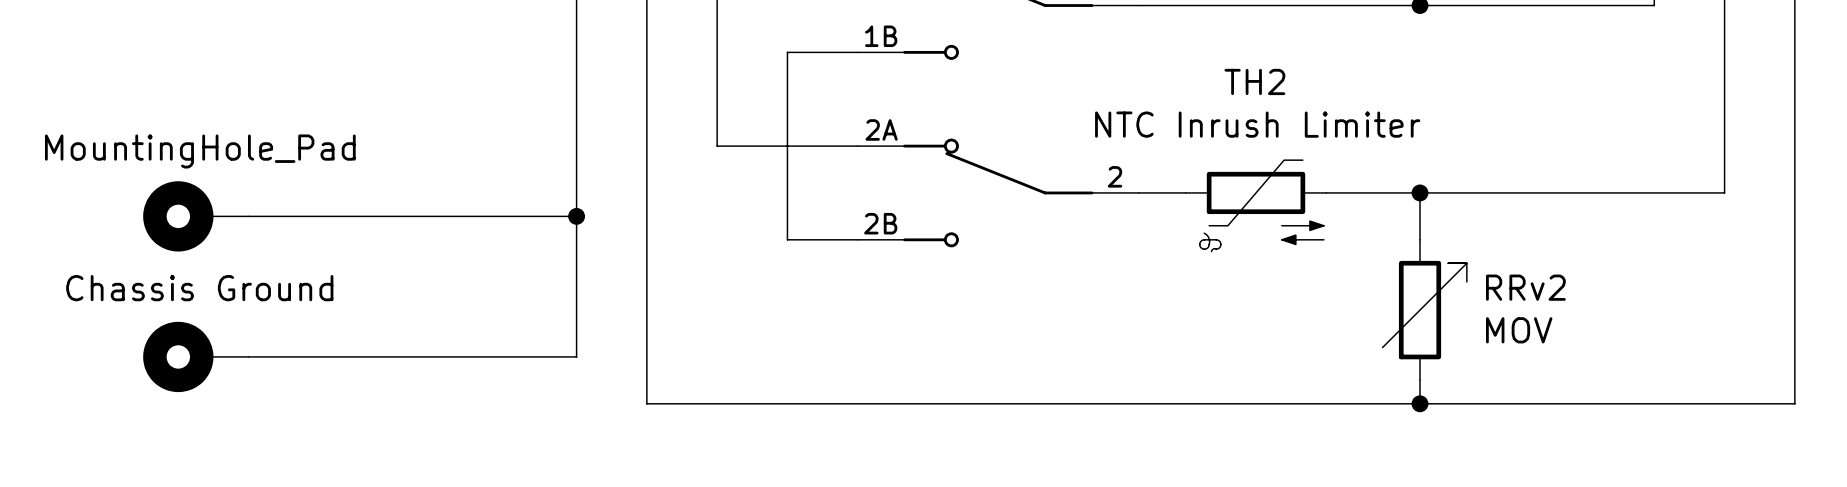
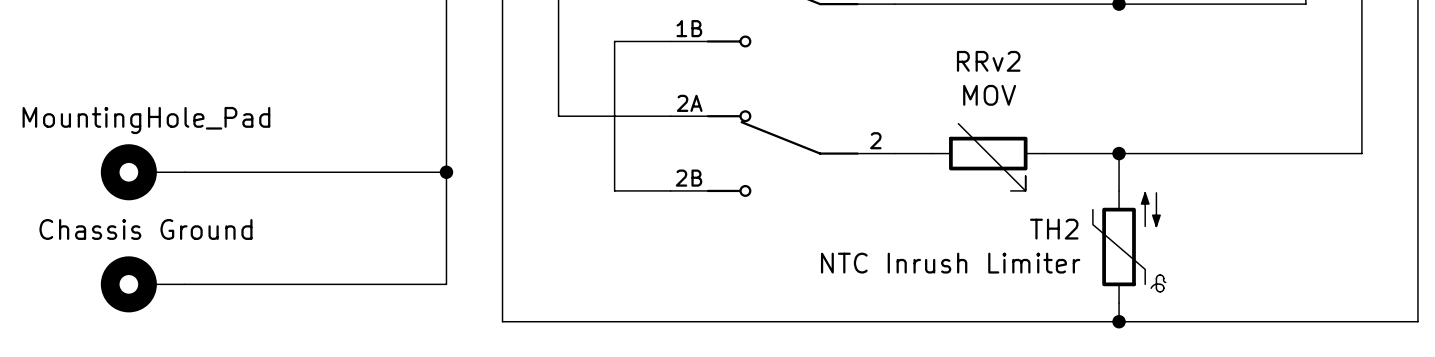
TH2 value position: NTC Inrush Limiter (1257, 124) -> NTC Inrush Limiter (950, 263)
TH2 position: (1256, 205) -> (1129, 246)
TH2 rotation: 0° (1261, 205) -> 90° counterclockwise (1129, 242)
RRv2 name position: RRv2 (1525, 287) -> RRv2 (988, 61)
RRv2 rotation: 0° (1424, 310) -> 90° clockwise (988, 157)
RRv2 position: (1424, 310) -> (988, 157)
RRv2 value position: MOV (1519, 330) -> MOV (989, 95)

